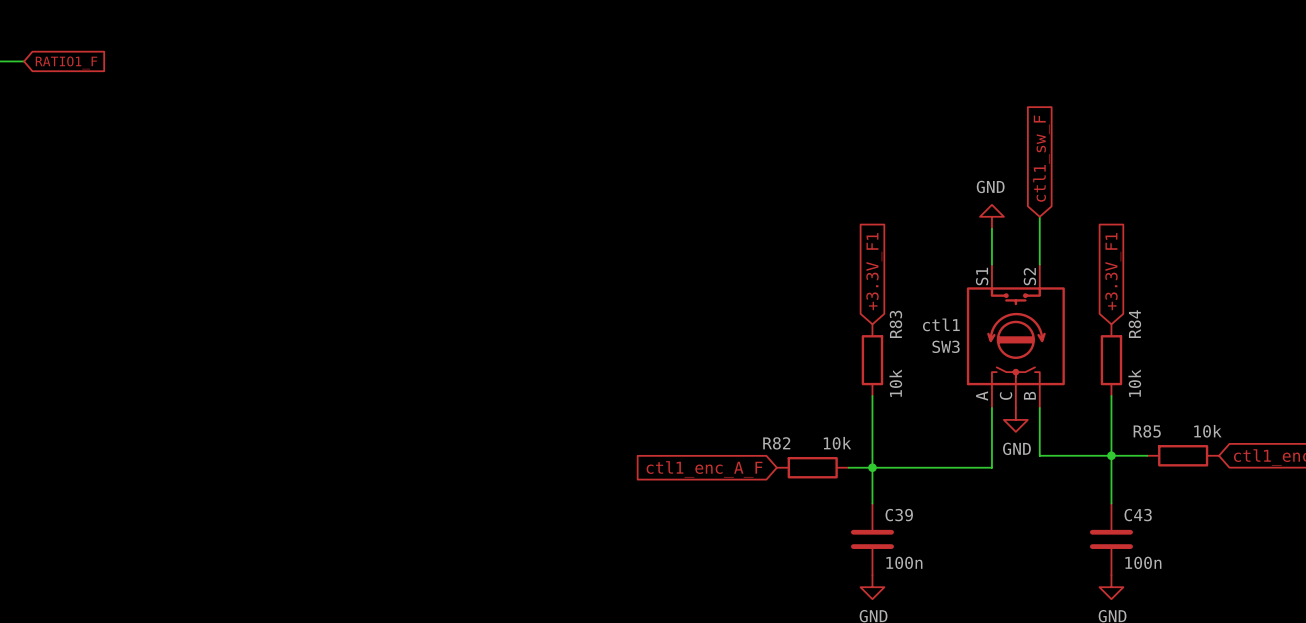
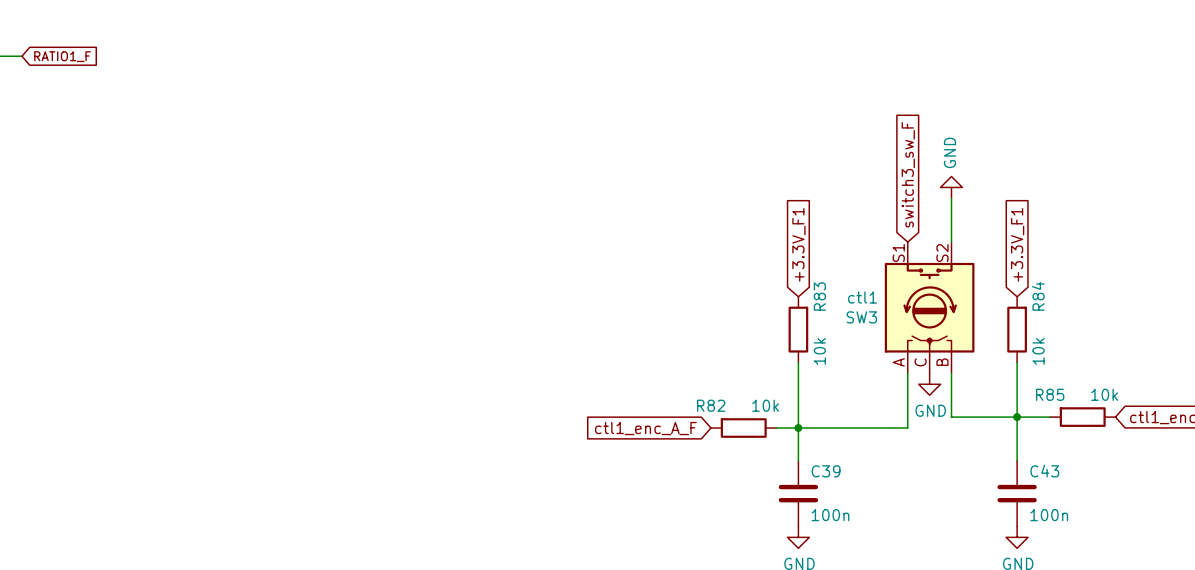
global label: ctl1_sw_F (1041, 158) -> none
power symbol text rotation: 0° (990, 186) -> 90° counterclockwise (949, 152)
global label: none -> switch3_sw_F (908, 174)
power symbol position: GND (991, 216) -> GND (951, 187)
wire: (991, 228) (991, 264) -> none

